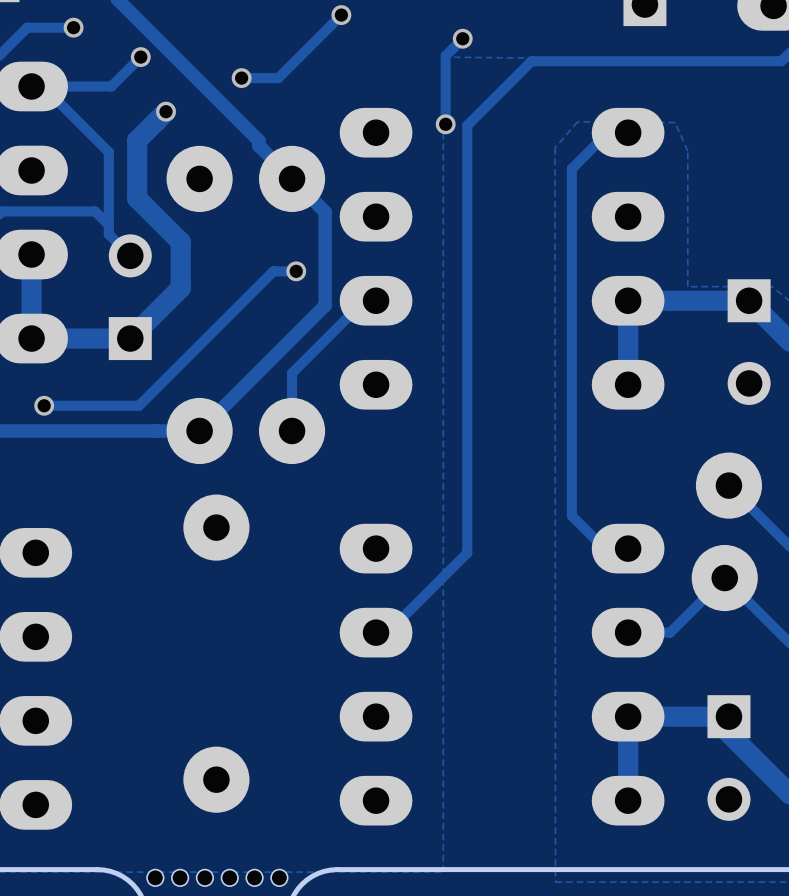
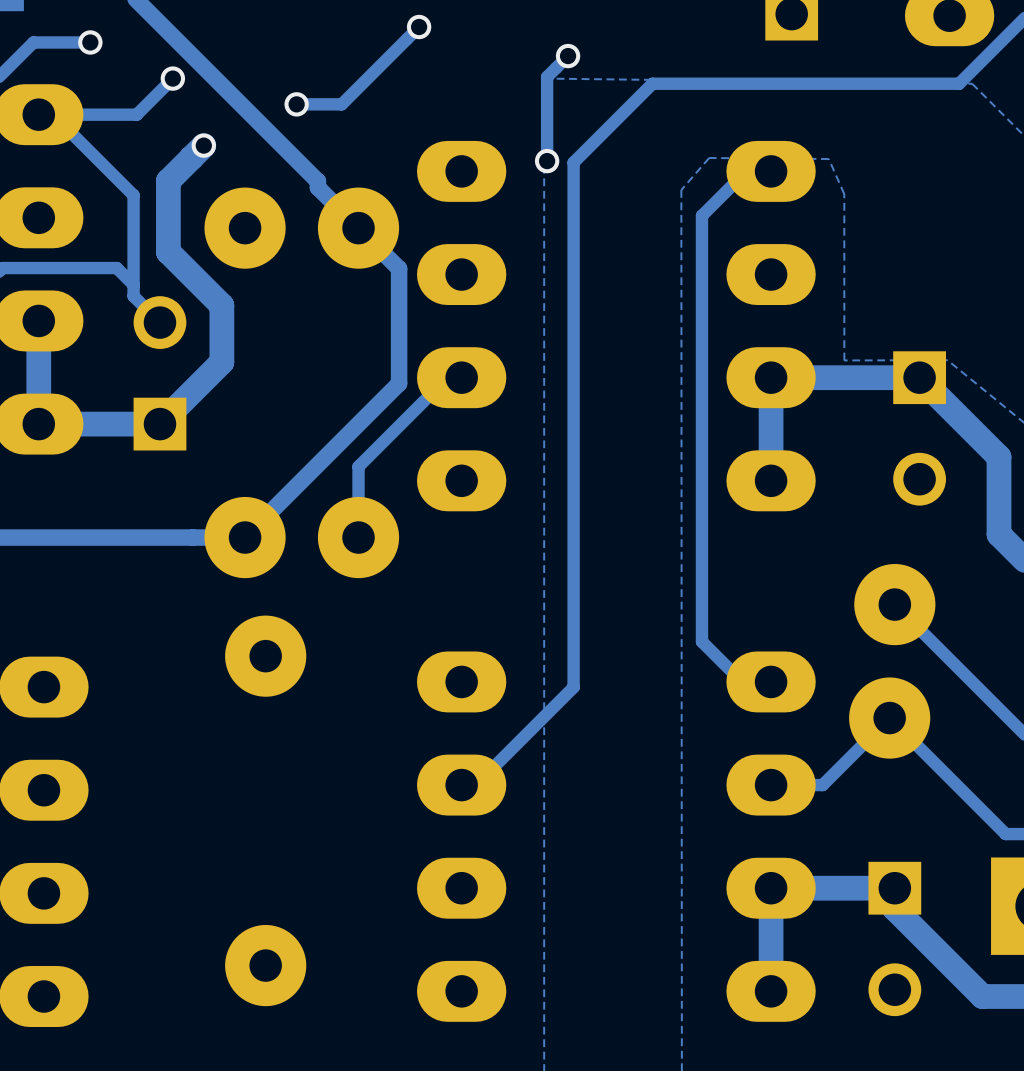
track: (296, 271) (273, 271) (138, 405) (44, 405) -> none
via: (296, 271) -> none
via: (44, 405) -> none

